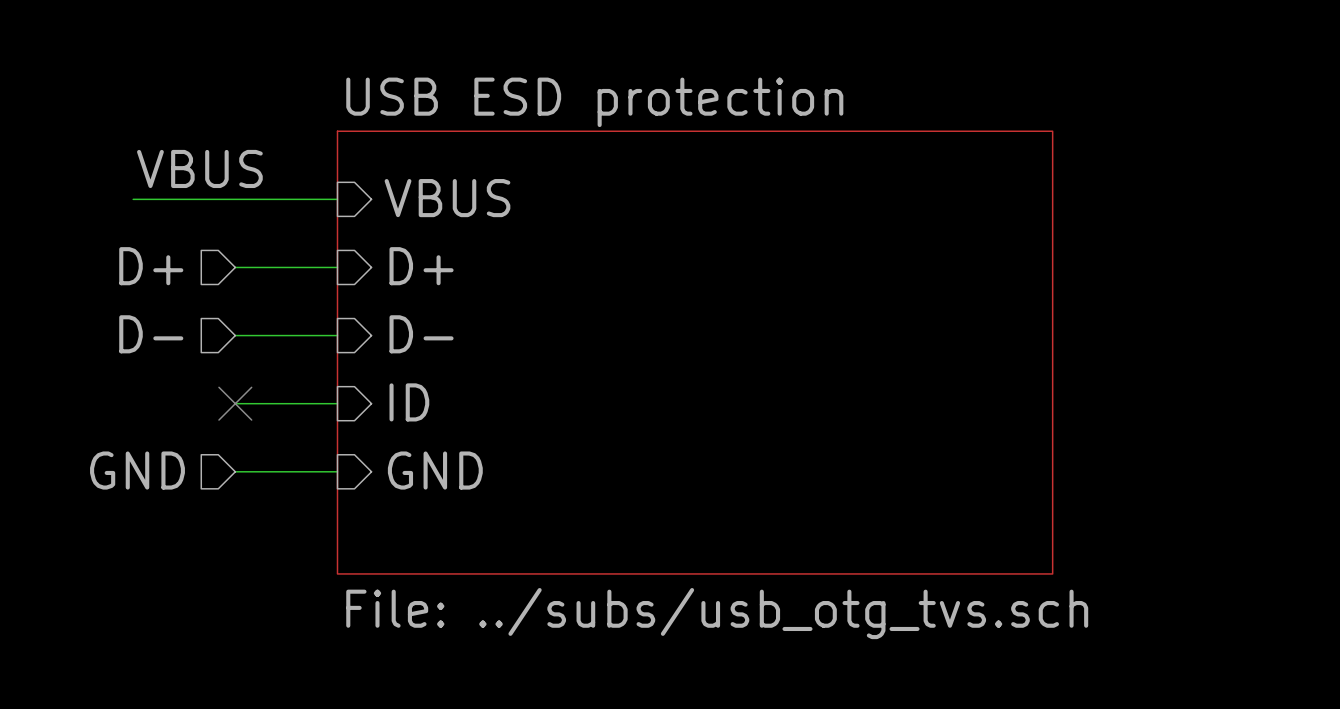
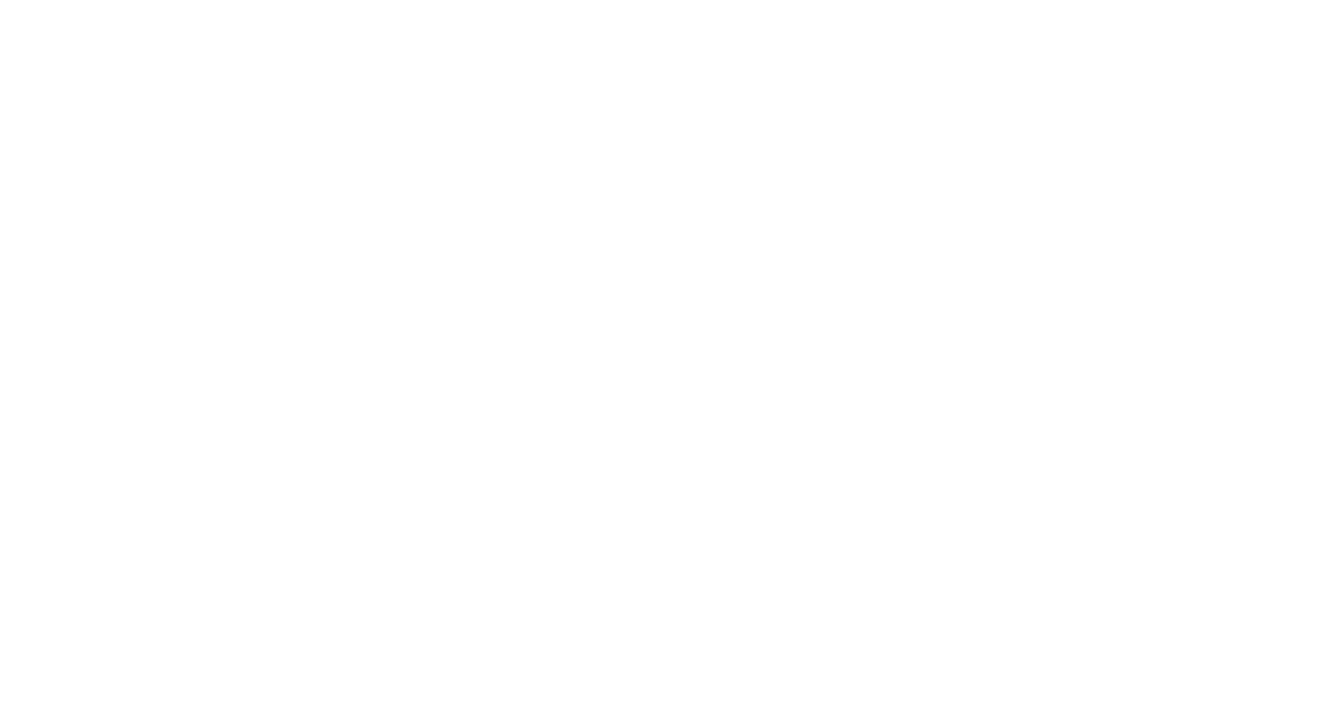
label: VBUS (199, 168) -> none
sheet pin: VBUS (447, 198) -> none
wire: (133, 199) (337, 199) -> none
hierarchical label: D+ (151, 266) -> none
sheet pin: D+ (421, 266) -> none
wire: (235, 267) (337, 267) -> none
hierarchical label: D- (151, 334) -> none
sheet pin: D- (421, 334) -> none
wire: (235, 335) (337, 335) -> none
sheet USB ESD protection: File: ../subs/usb_otg_tvs.sch (695, 352) -> none
sheet pin: ID (409, 402) -> none
wire: (235, 403) (337, 403) -> none
no-connect mark: (235, 403) -> none
hierarchical label: GND (137, 470) -> none
sheet pin: GND (435, 470) -> none
wire: (235, 471) (337, 471) -> none

